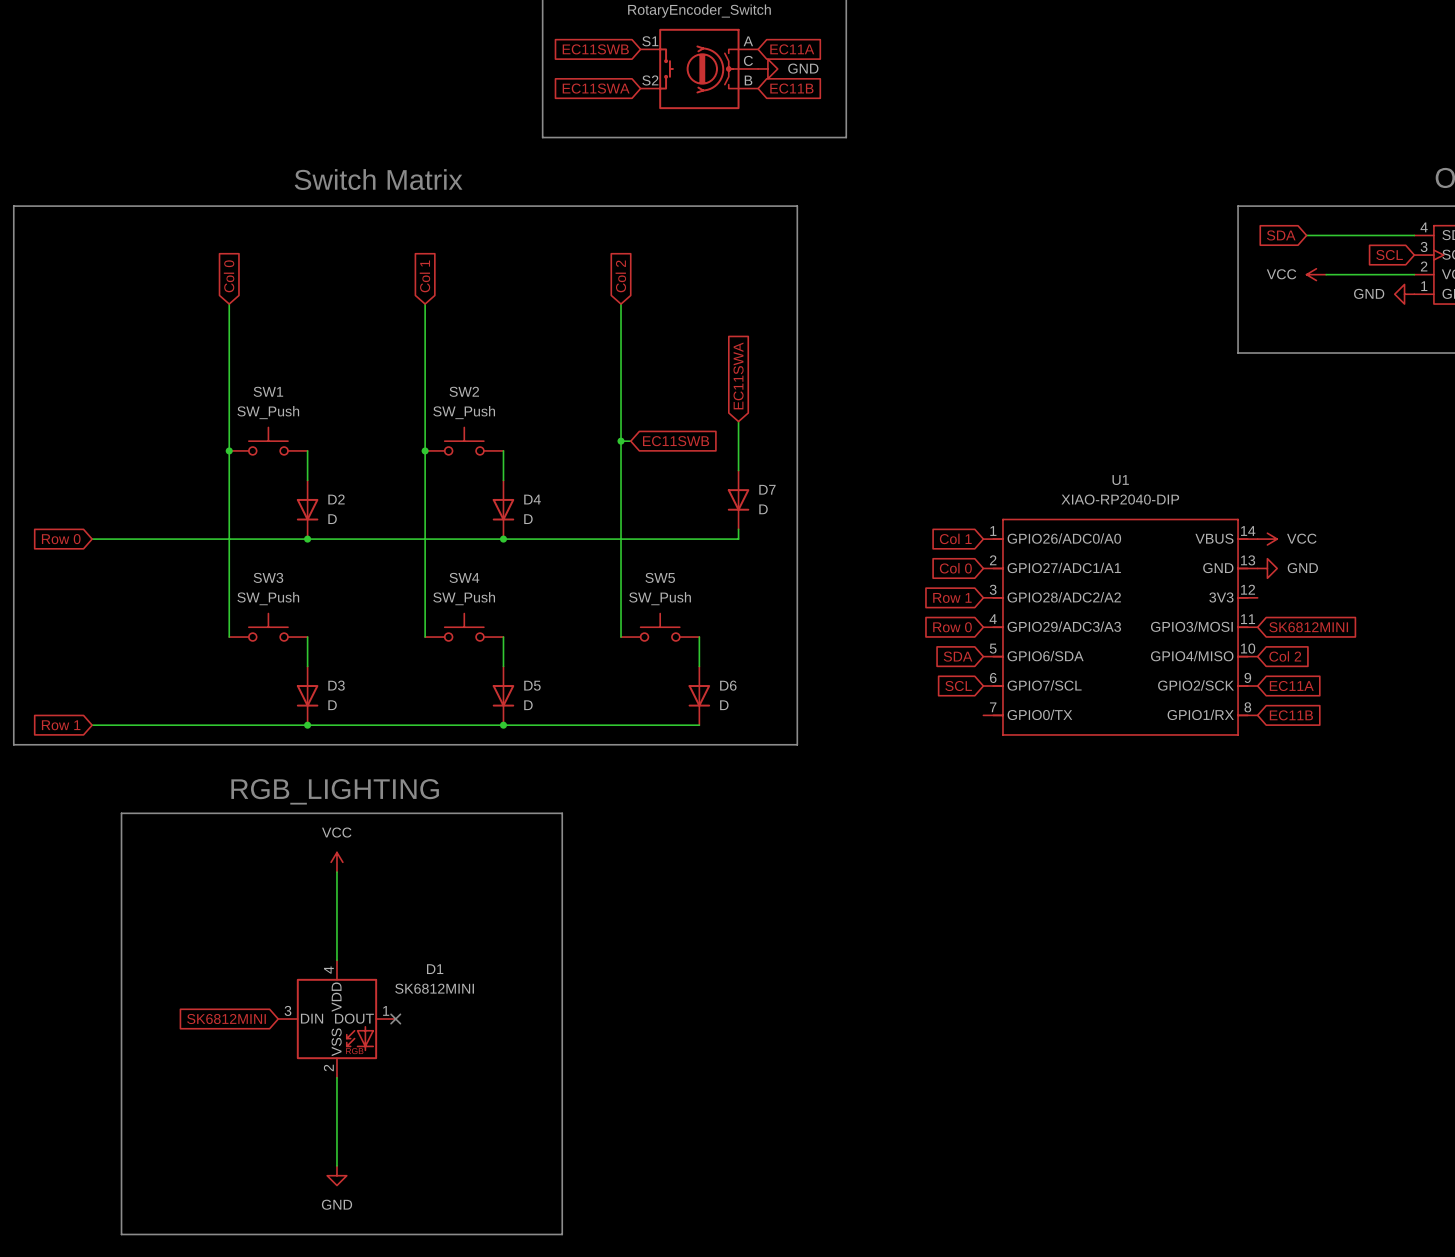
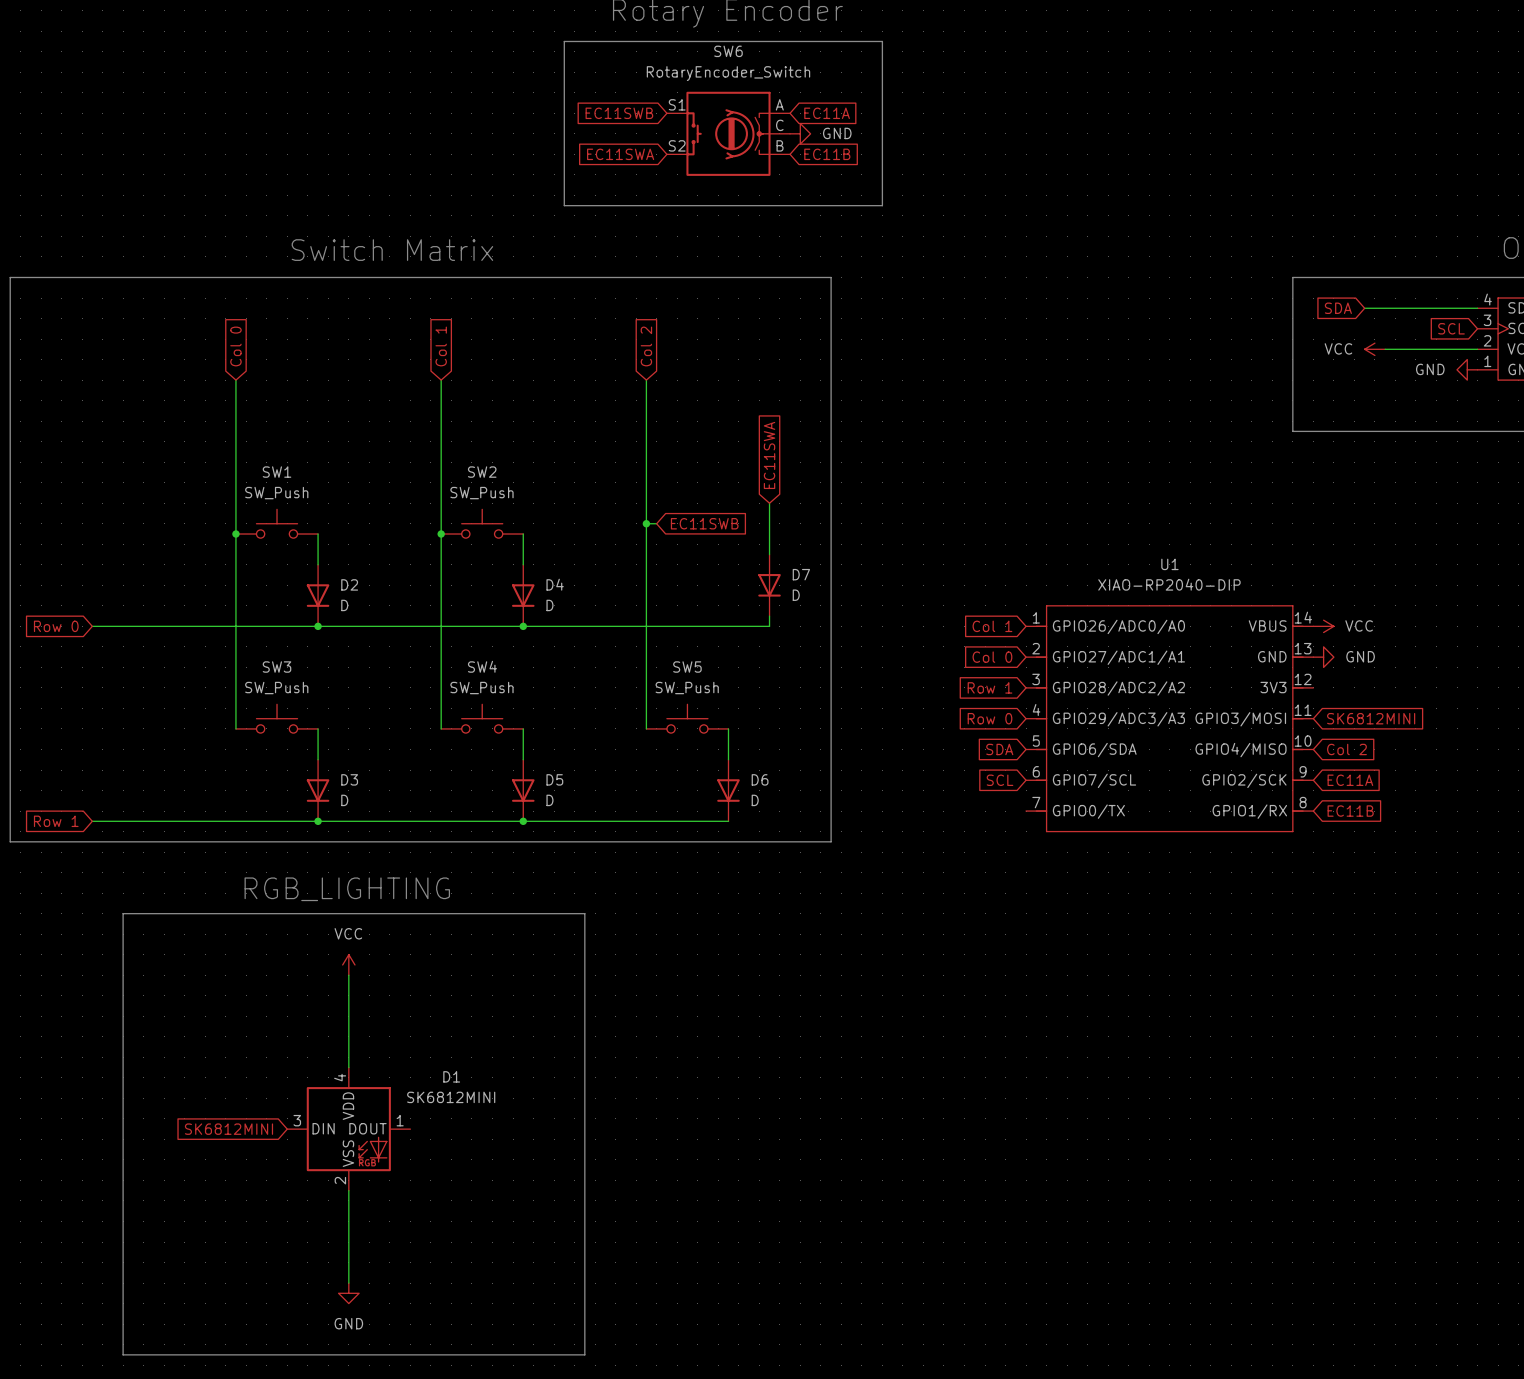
no-connect mark: (395, 1019) -> none

